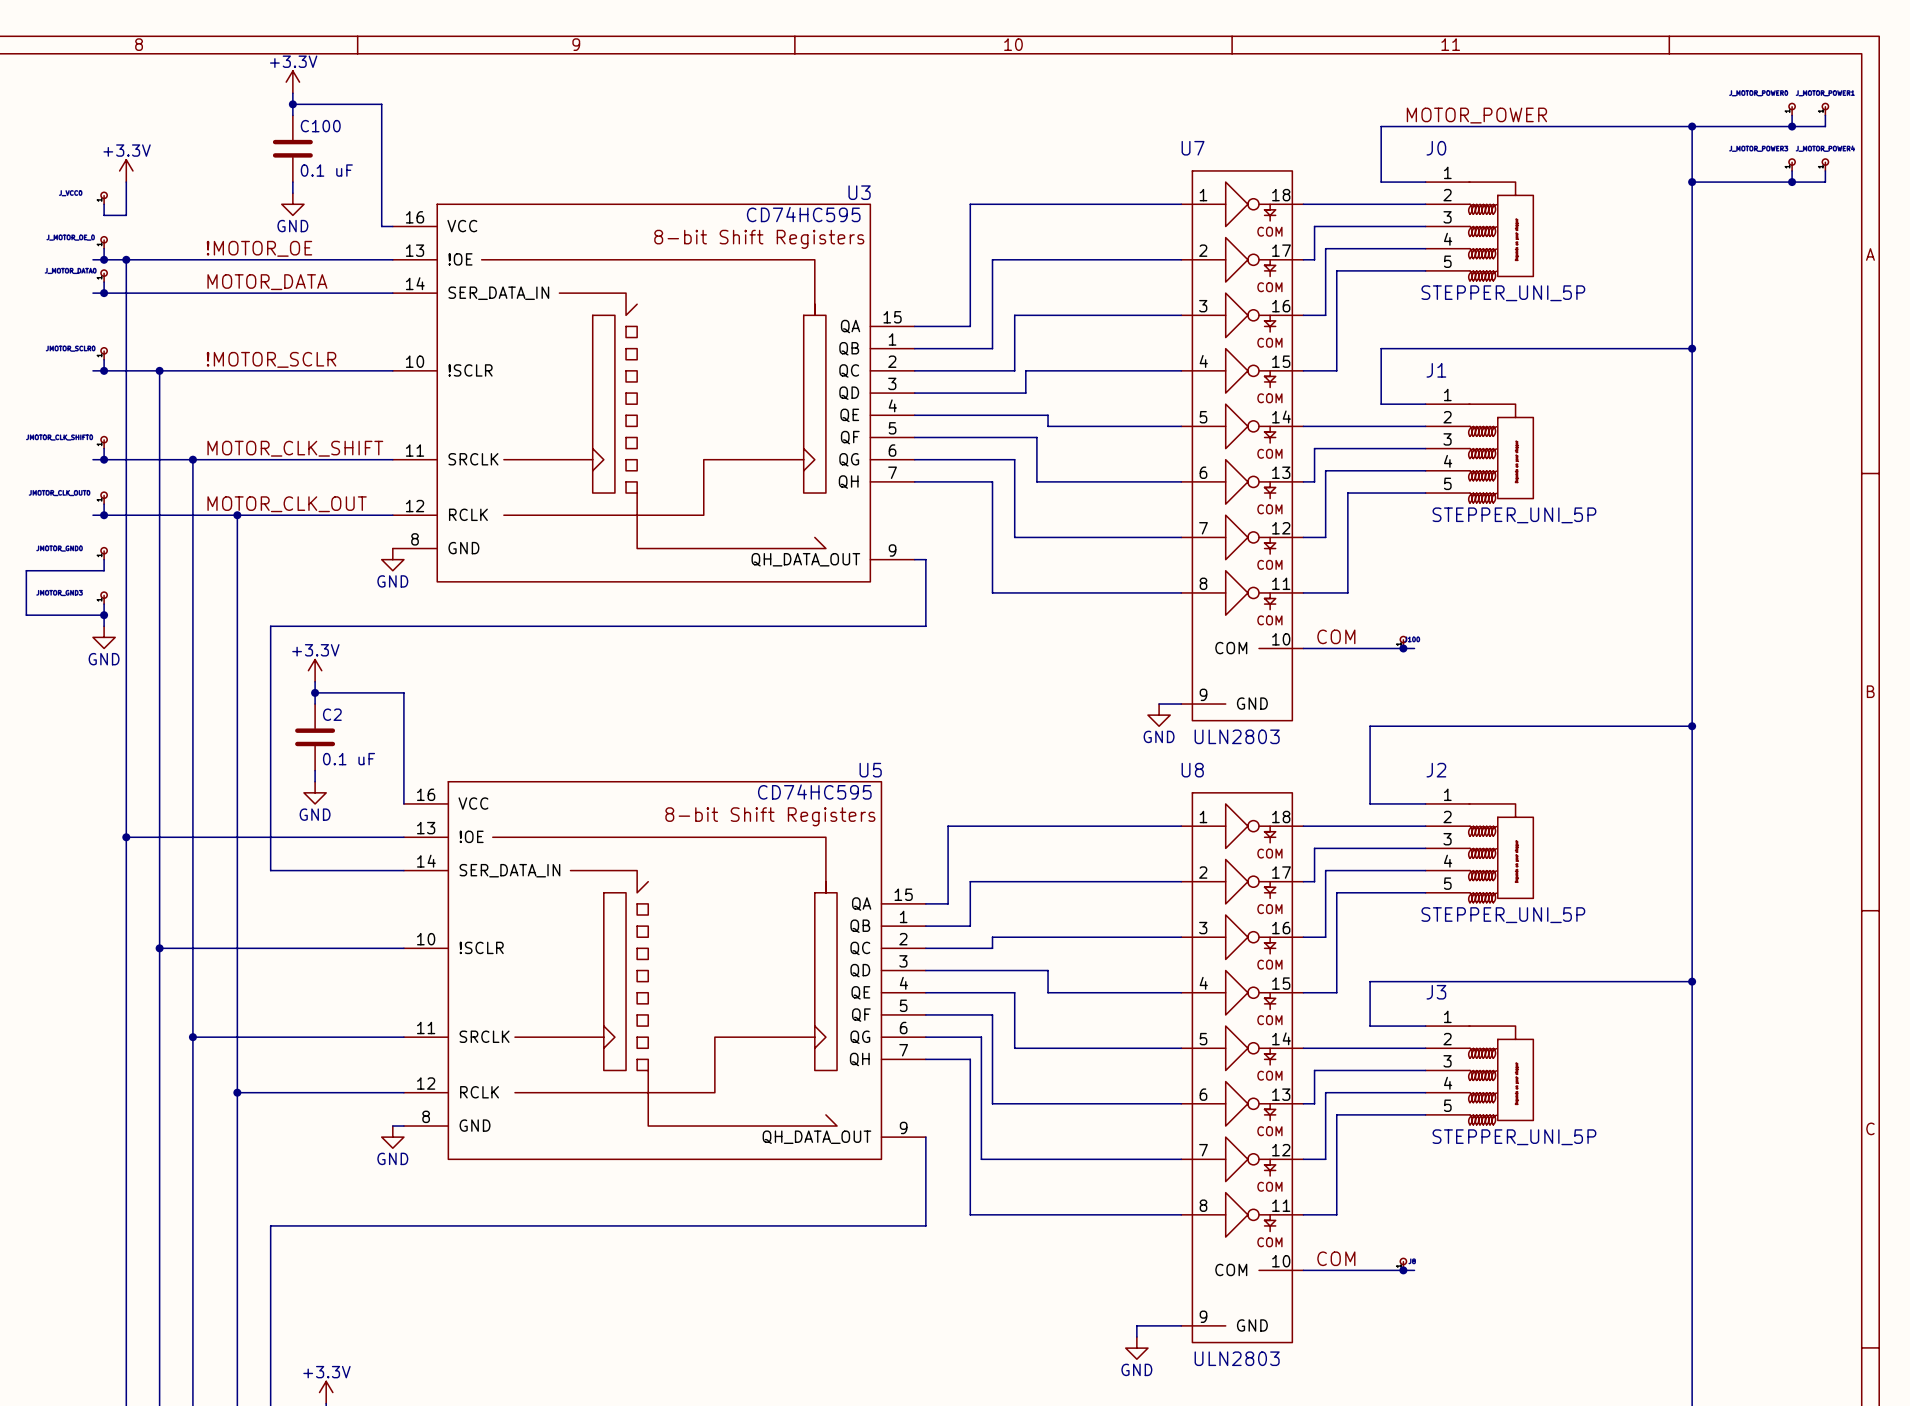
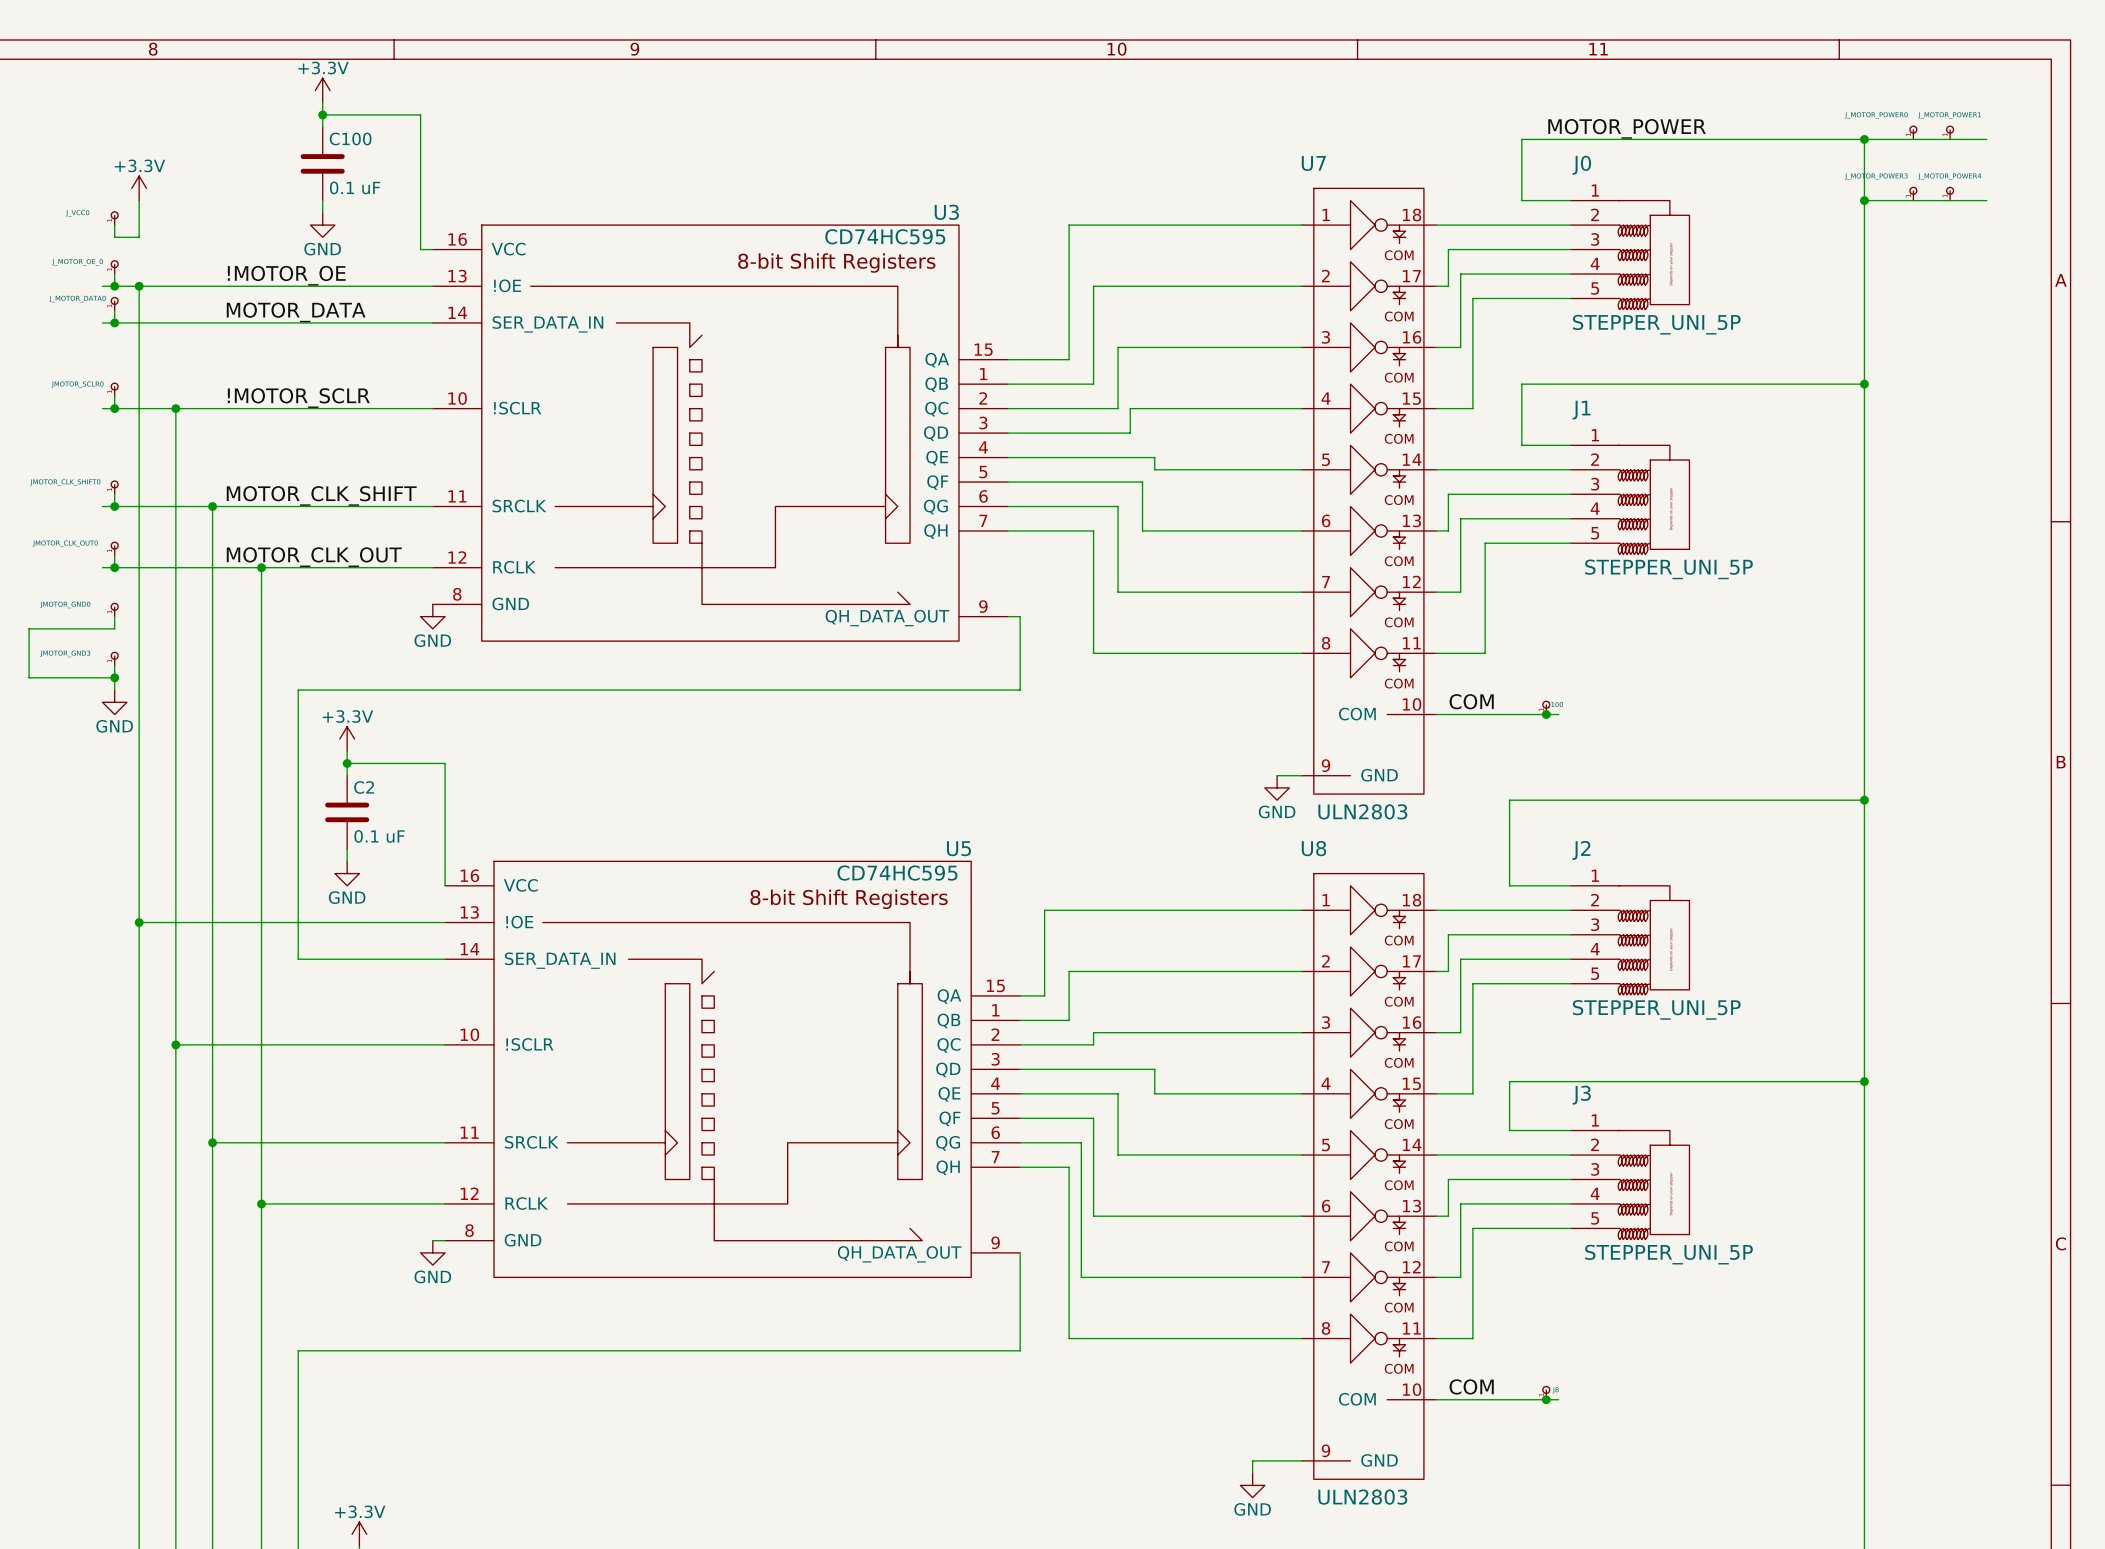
part position: (1792, 109) -> (1913, 132)
part position: (1825, 109) -> (1950, 132)
wire: (1792, 115) (1792, 126) -> none
wire: (1825, 115) (1825, 126) (1803, 126) -> none
junction: (1792, 126) -> none
part position: (1792, 164) -> (1913, 194)
part position: (1825, 164) -> (1950, 194)
wire: (1792, 170) (1792, 182) -> none
wire: (1825, 170) (1825, 182) (1803, 182) -> none
junction: (1792, 182) -> none

